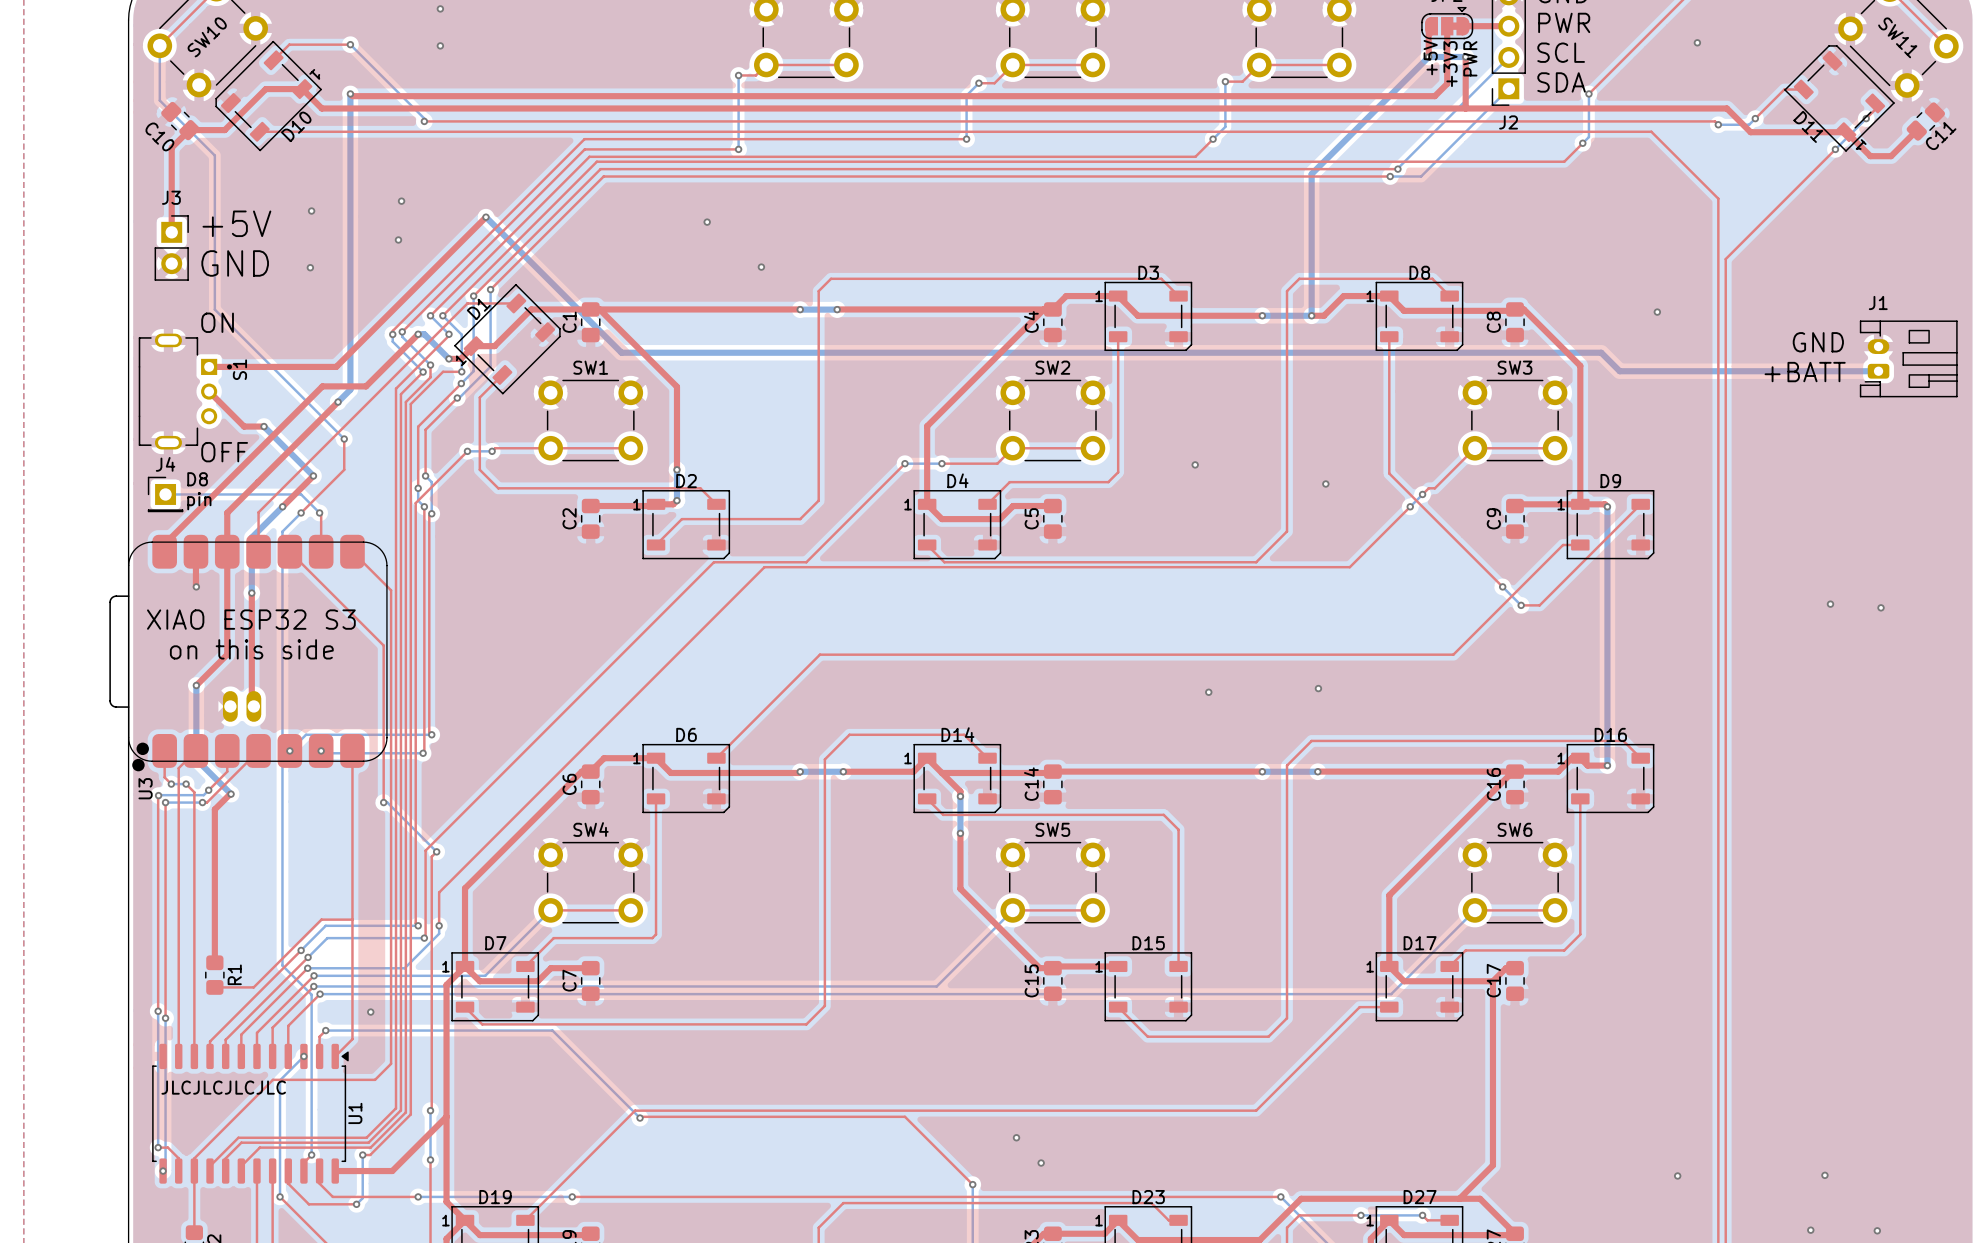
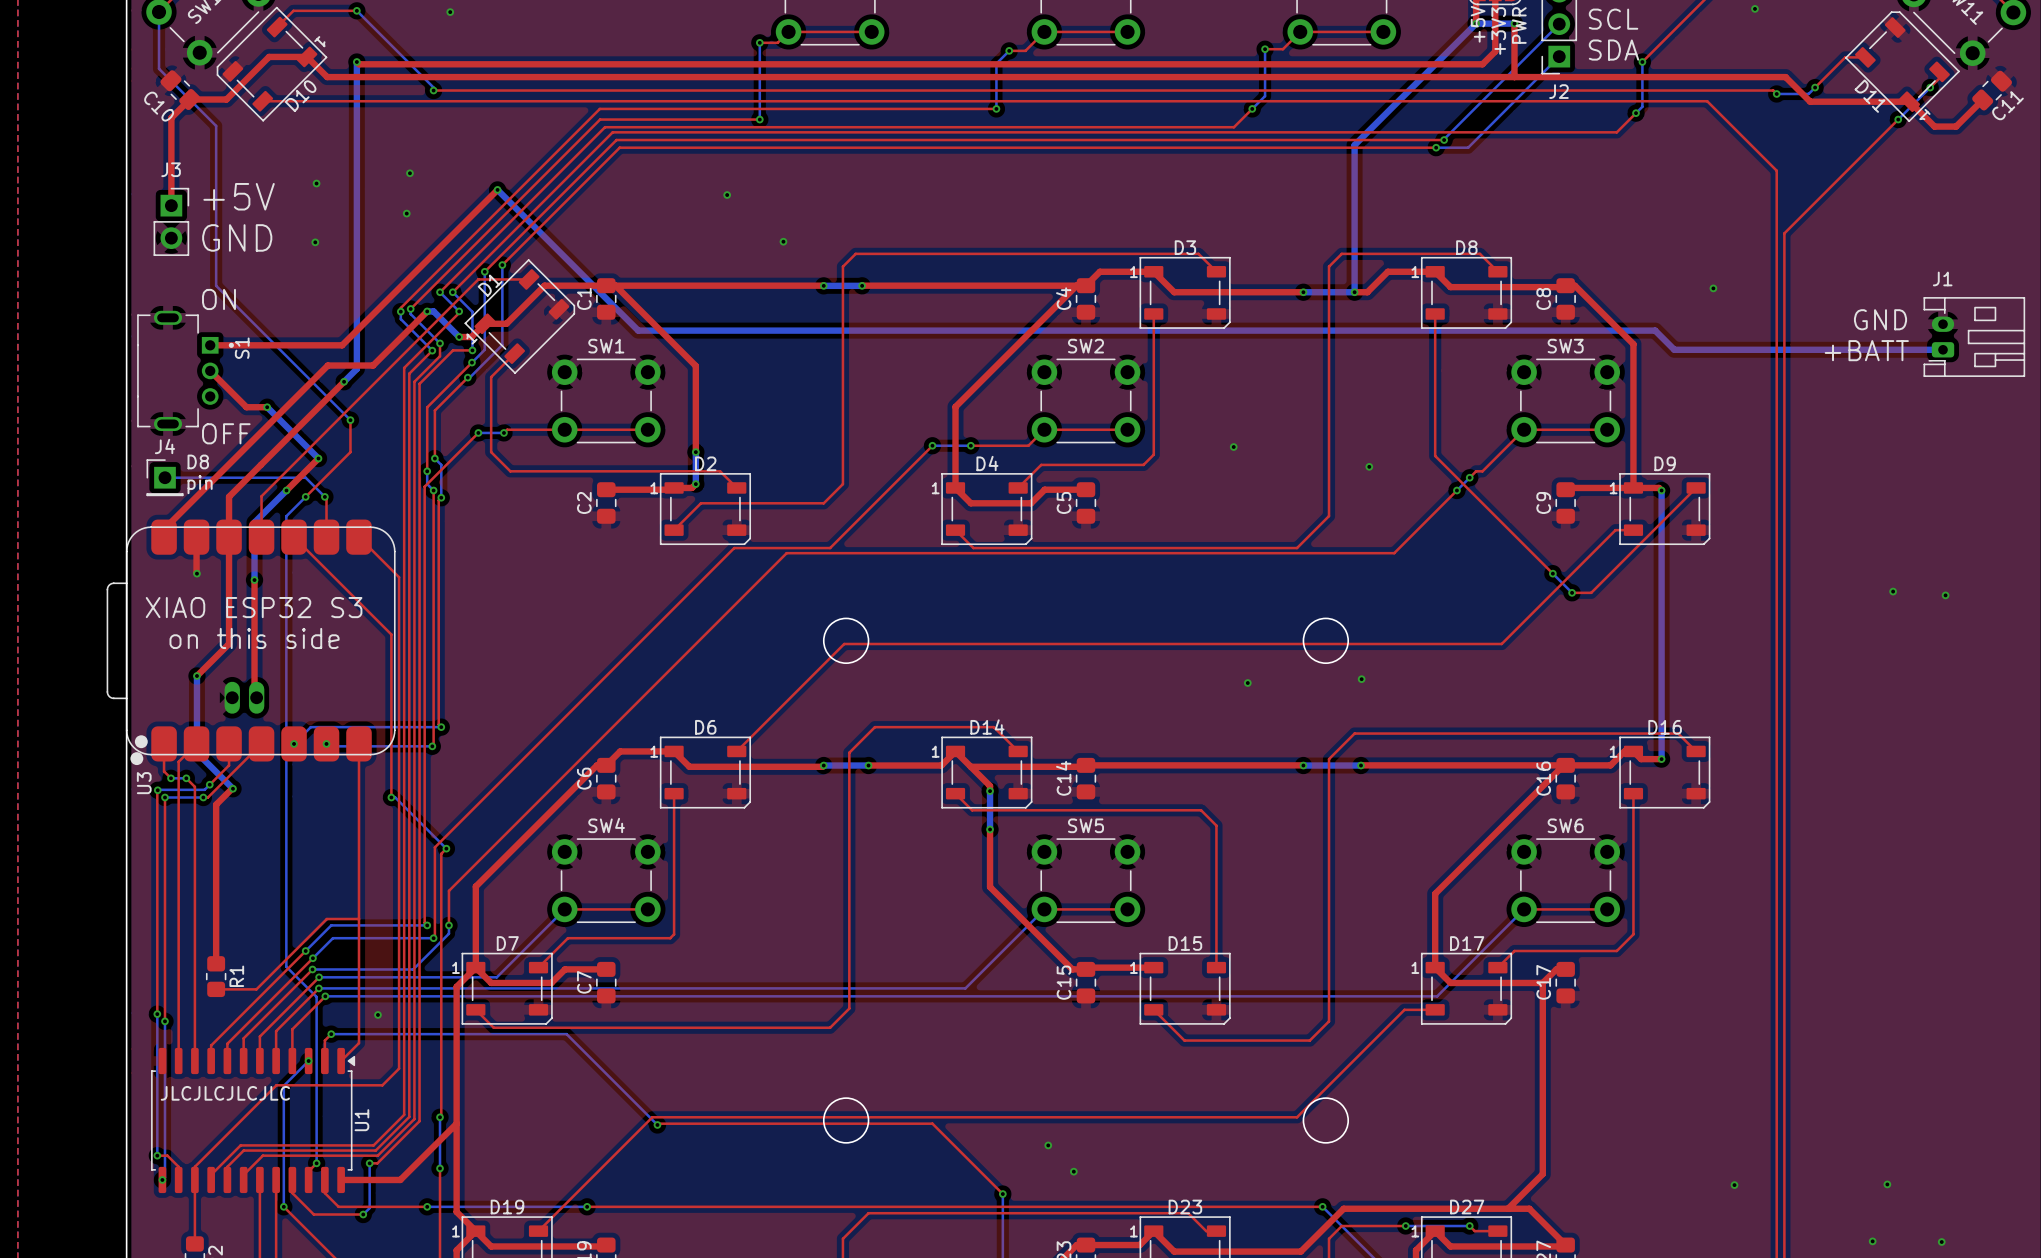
round board edge: none -> [823, 617, 870, 664]
round board edge: none -> [1302, 617, 1349, 664]
round board edge: none -> [823, 1097, 870, 1144]
round board edge: none -> [1302, 1097, 1349, 1144]

